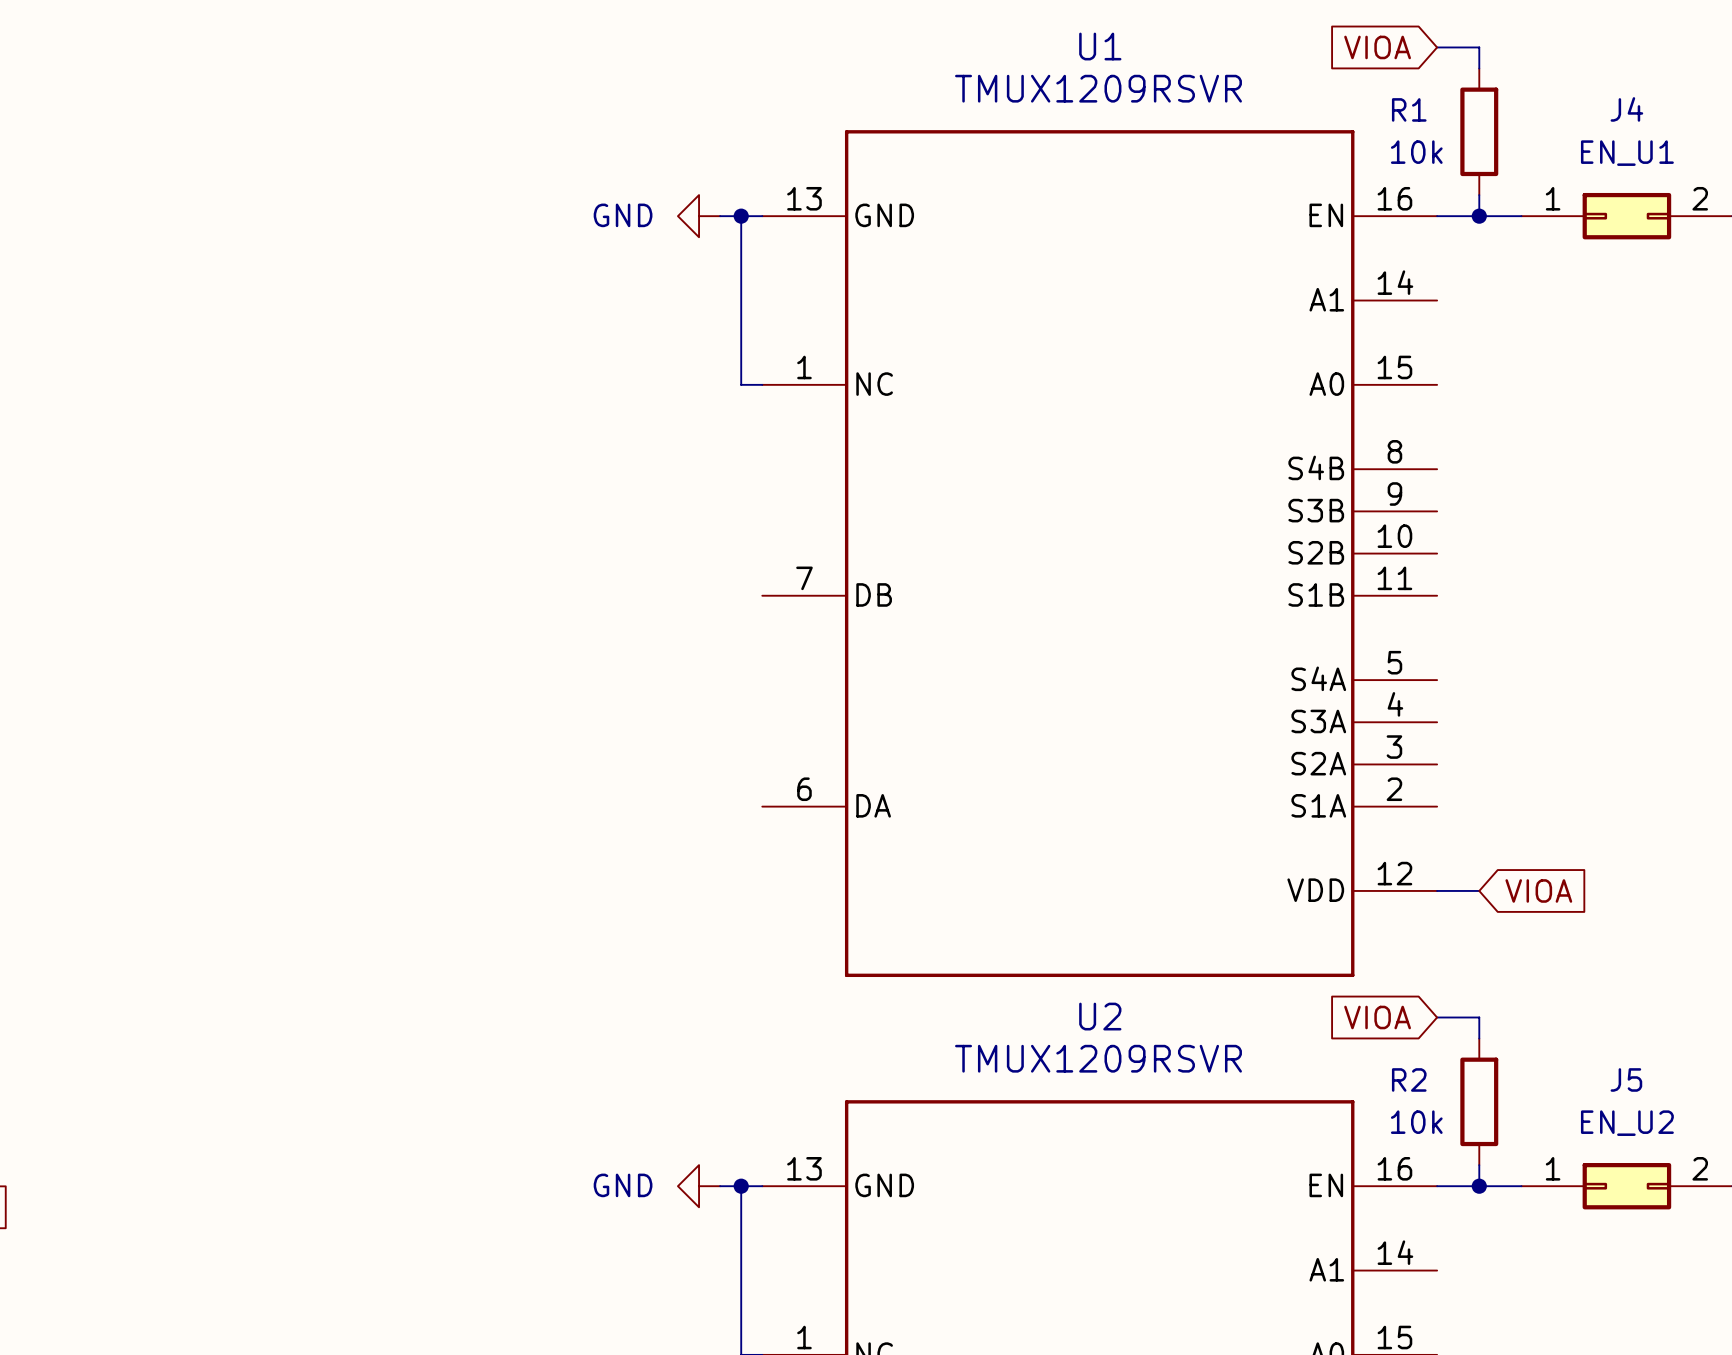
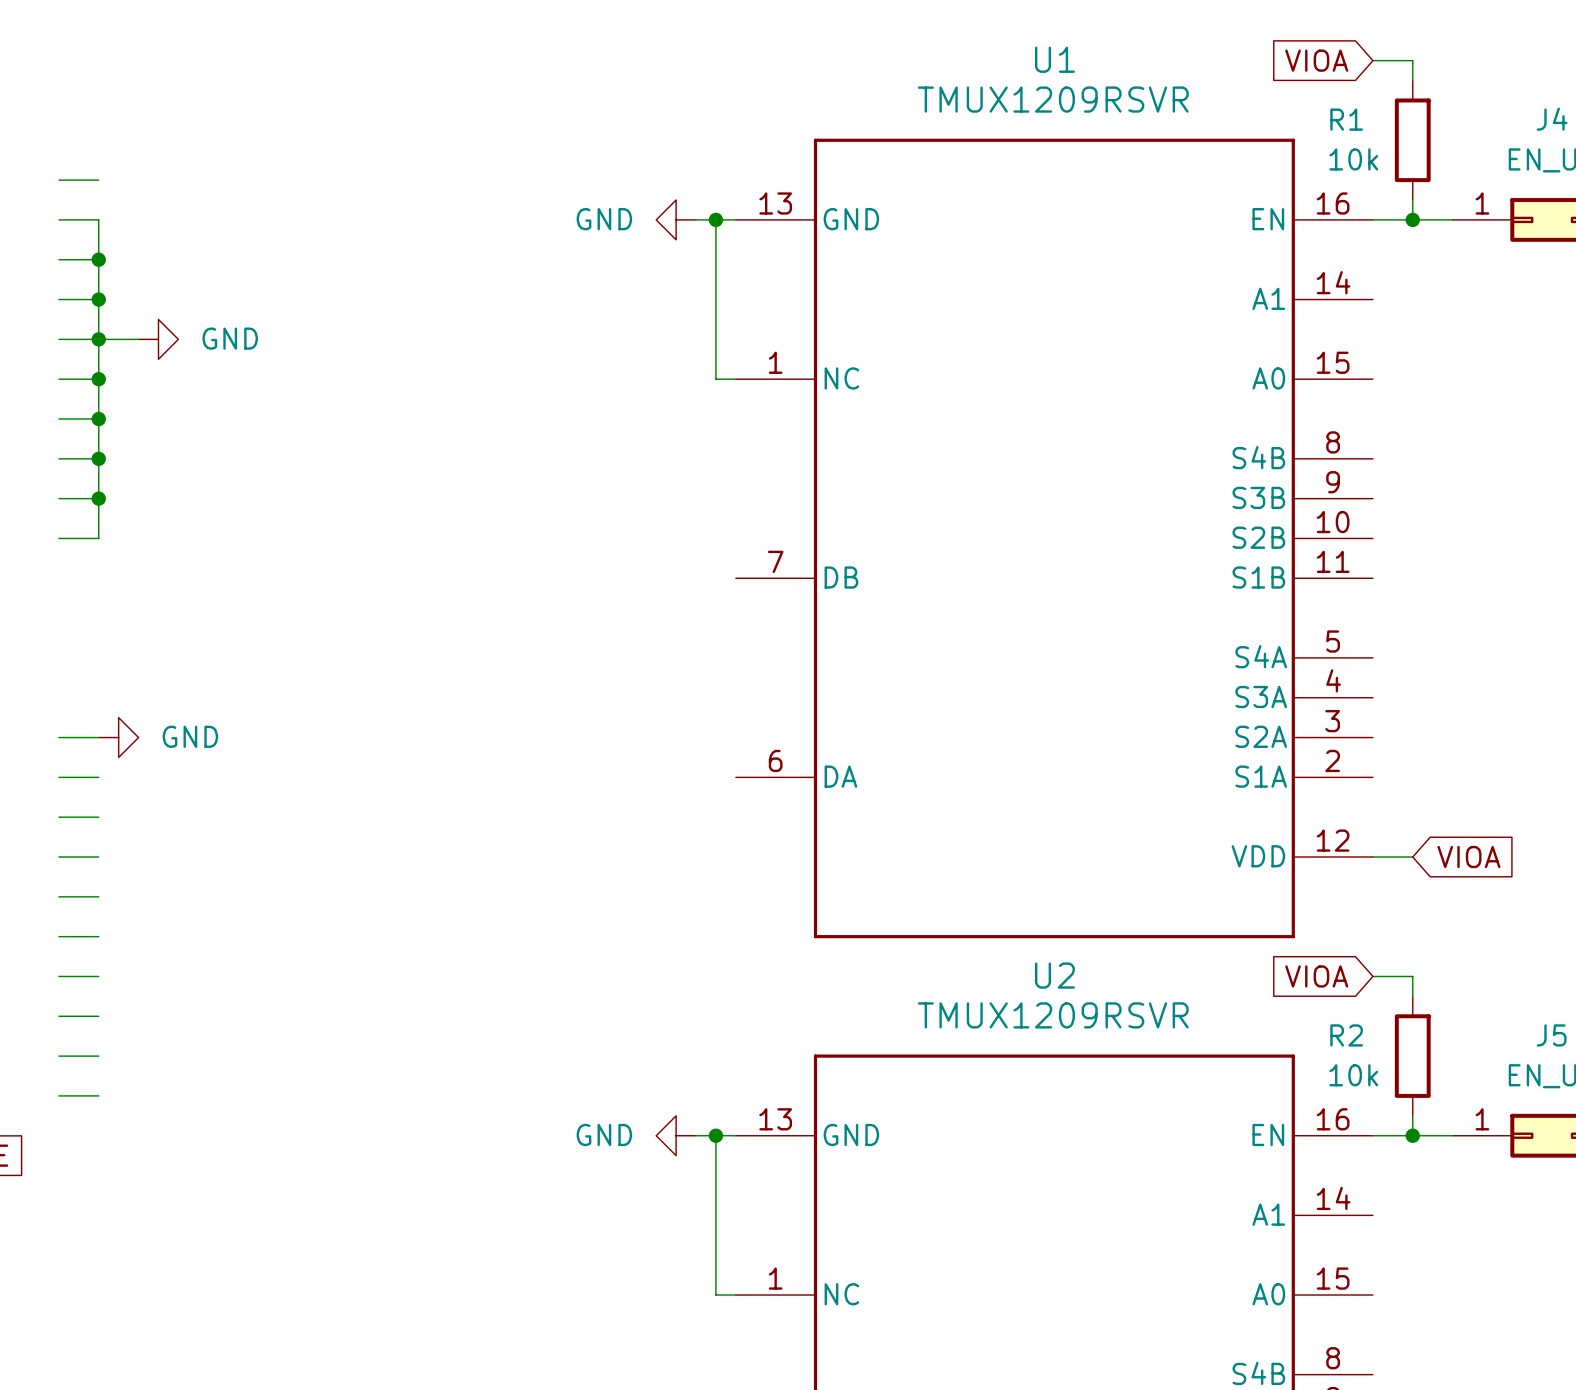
wire: none -> (58, 180) (98, 180)
wire: none -> (58, 219) (98, 219) (98, 538) (58, 538)
wire: none -> (58, 259) (98, 259)
junction: none -> (98, 259)
wire: none -> (58, 299) (98, 299)
junction: none -> (98, 299)
wire: none -> (58, 339) (138, 339)
junction: none -> (98, 339)
power symbol: none -> GND (158, 339)
wire: none -> (58, 379) (98, 379)
junction: none -> (98, 379)
wire: none -> (58, 419) (98, 419)
junction: none -> (98, 419)
wire: none -> (58, 458) (98, 458)
junction: none -> (98, 458)
wire: none -> (58, 498) (98, 498)
junction: none -> (98, 498)
wire: none -> (58, 737) (98, 737)
power symbol: none -> GND (118, 737)
wire: none -> (58, 777) (98, 777)
wire: none -> (58, 817) (98, 817)
wire: none -> (58, 857) (98, 857)
wire: none -> (58, 896) (98, 896)
wire: none -> (58, 936) (98, 936)
wire: none -> (58, 976) (98, 976)
wire: none -> (58, 1016) (98, 1016)
wire: none -> (58, 1056) (98, 1056)
wire: none -> (58, 1095) (98, 1095)

